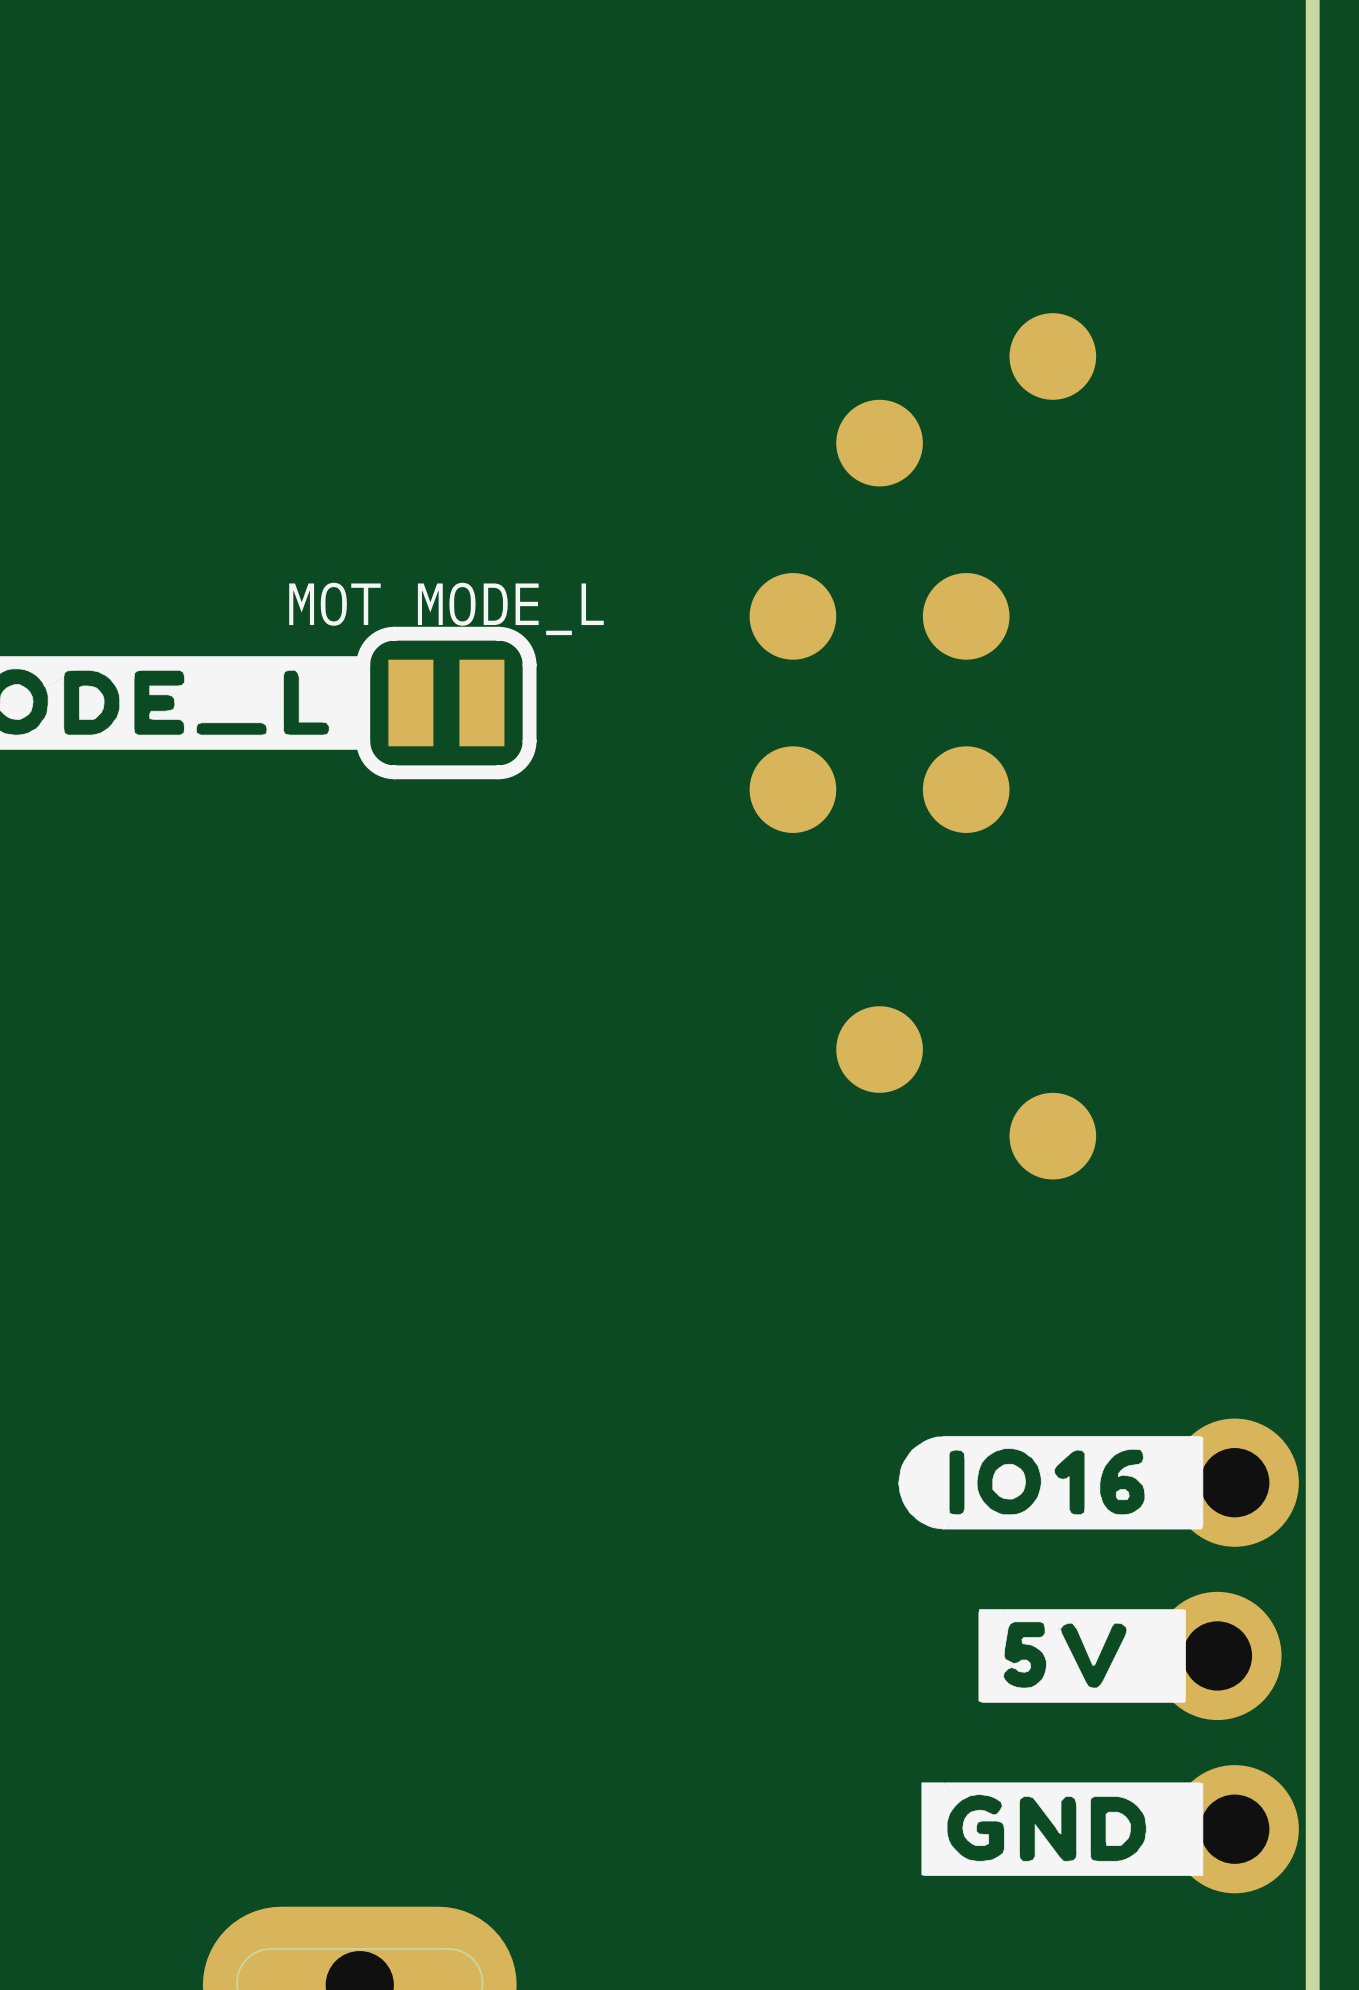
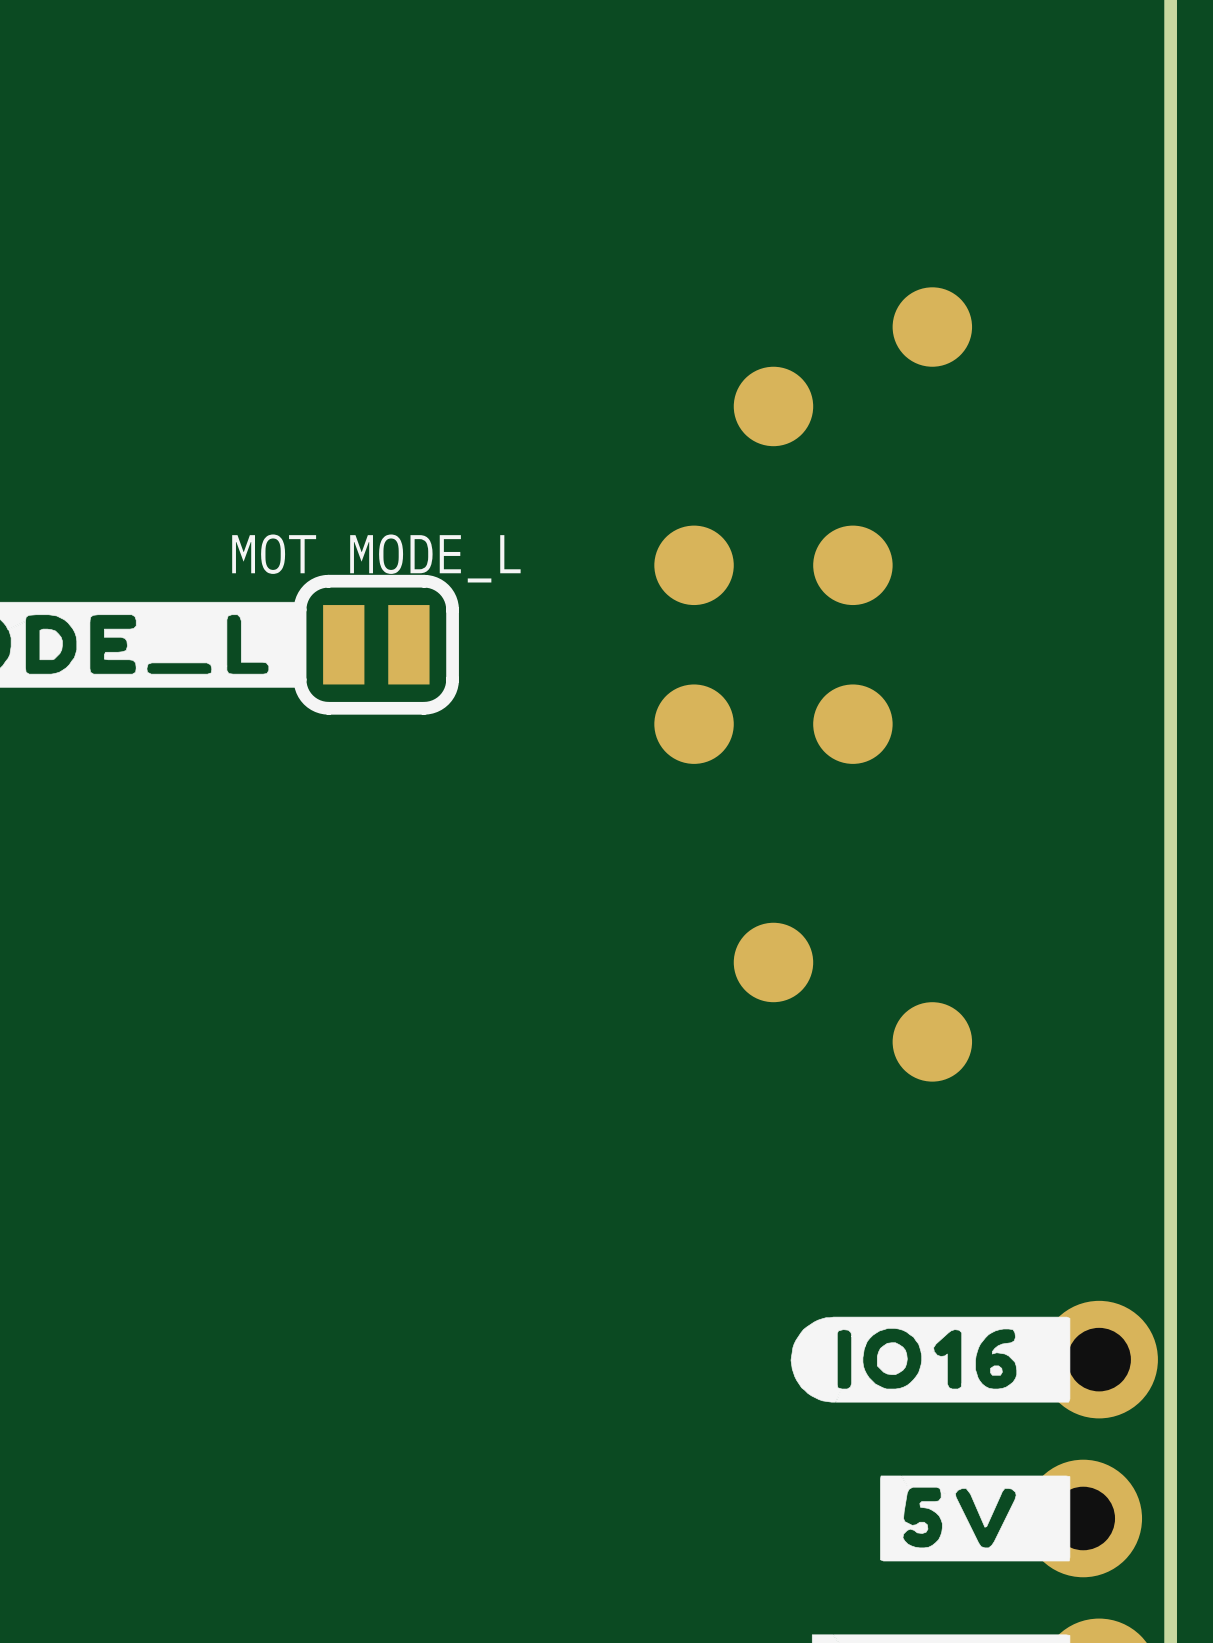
drawing position: (1082, 1655) -> (975, 1518)

